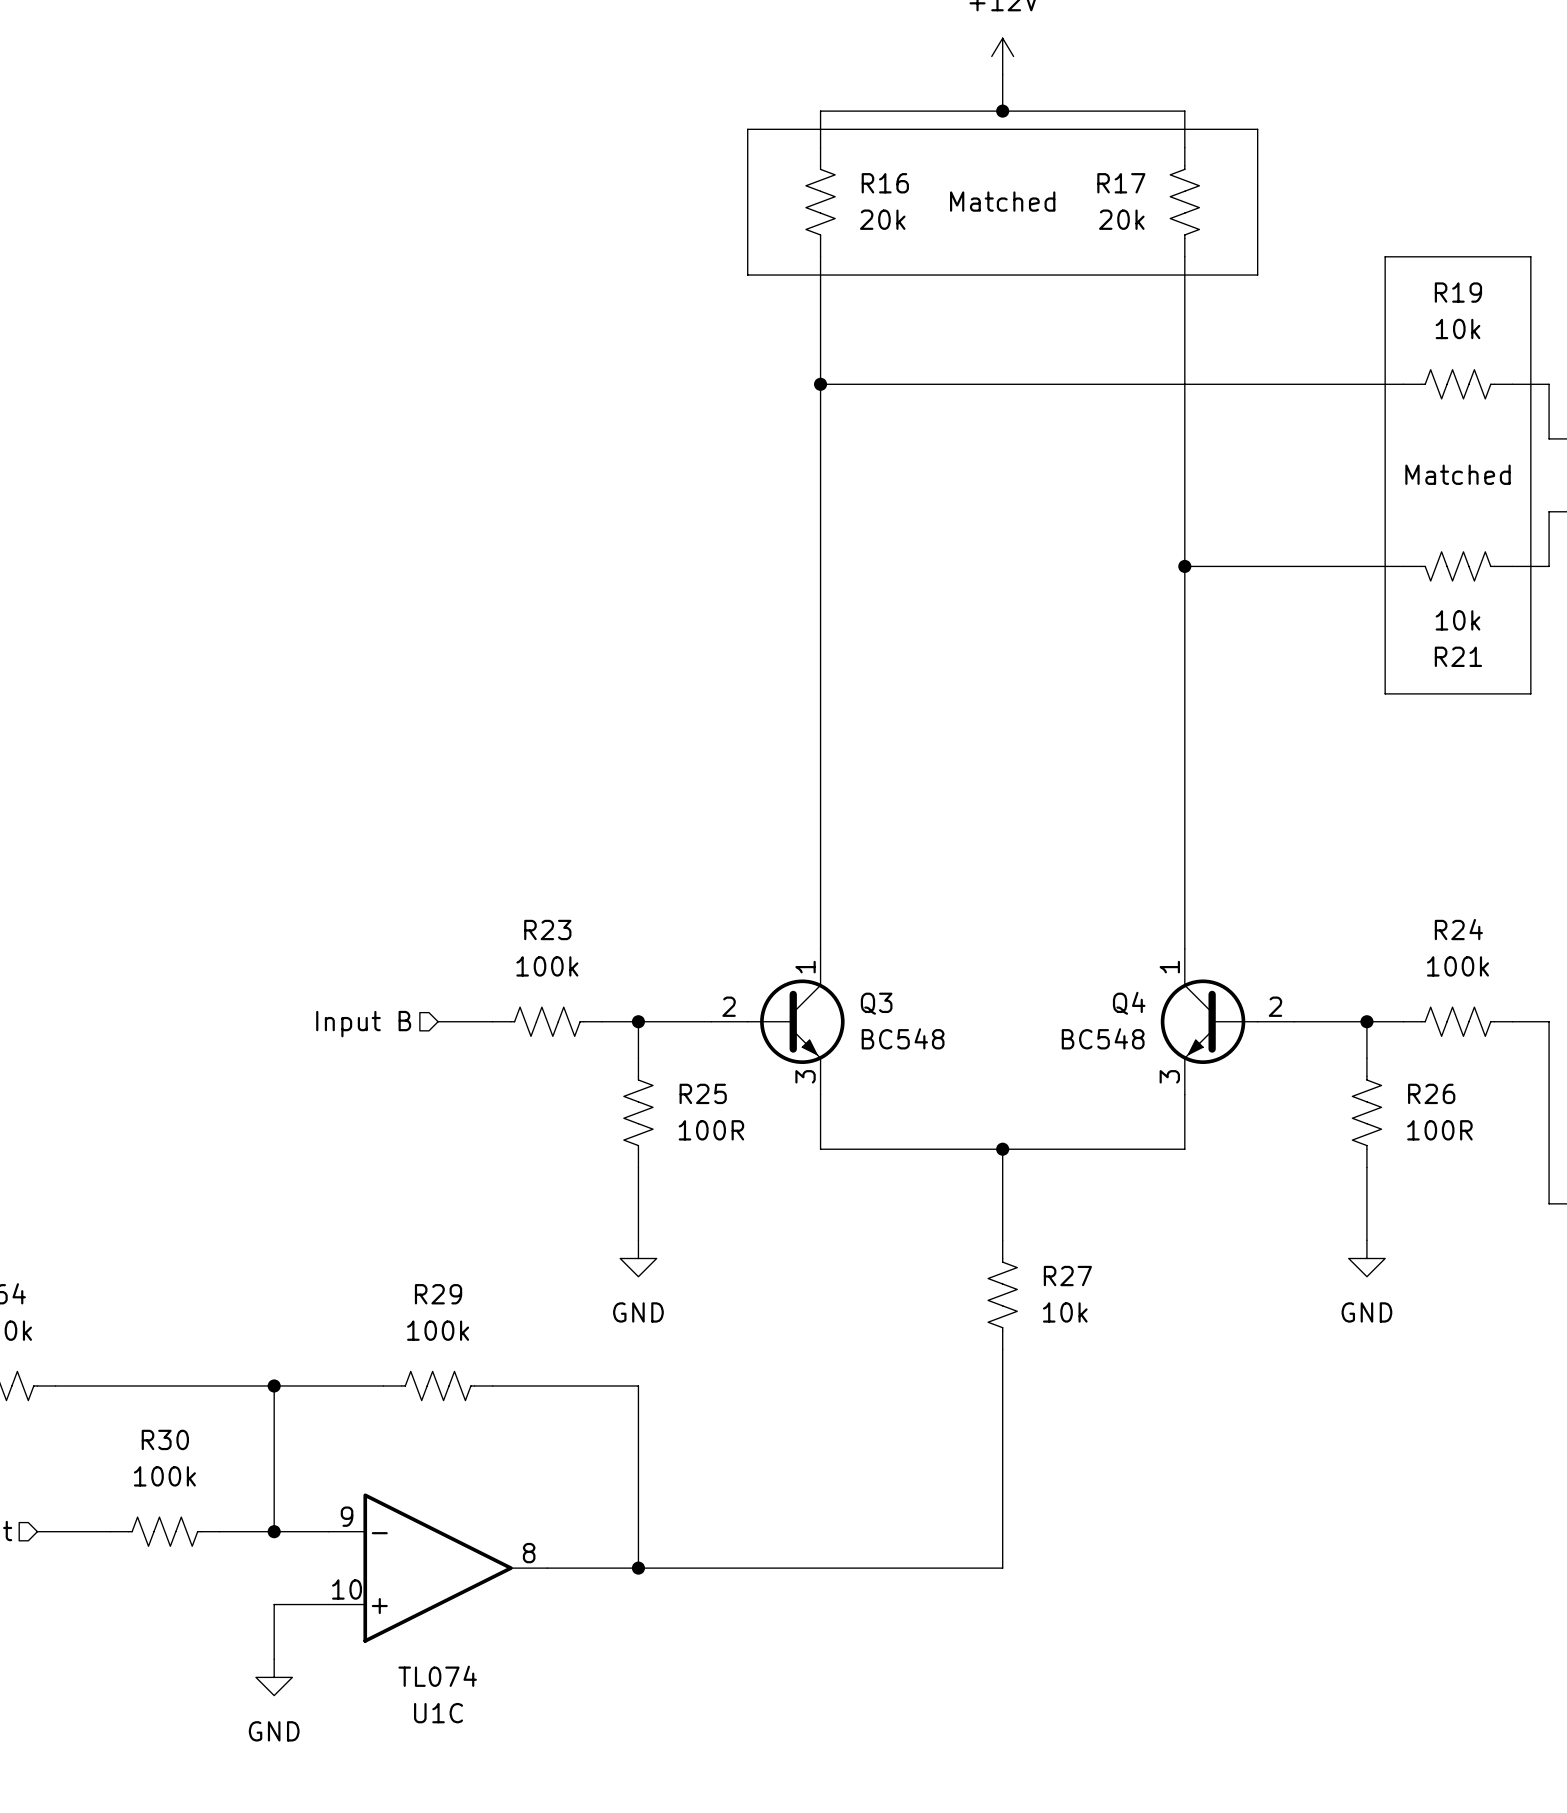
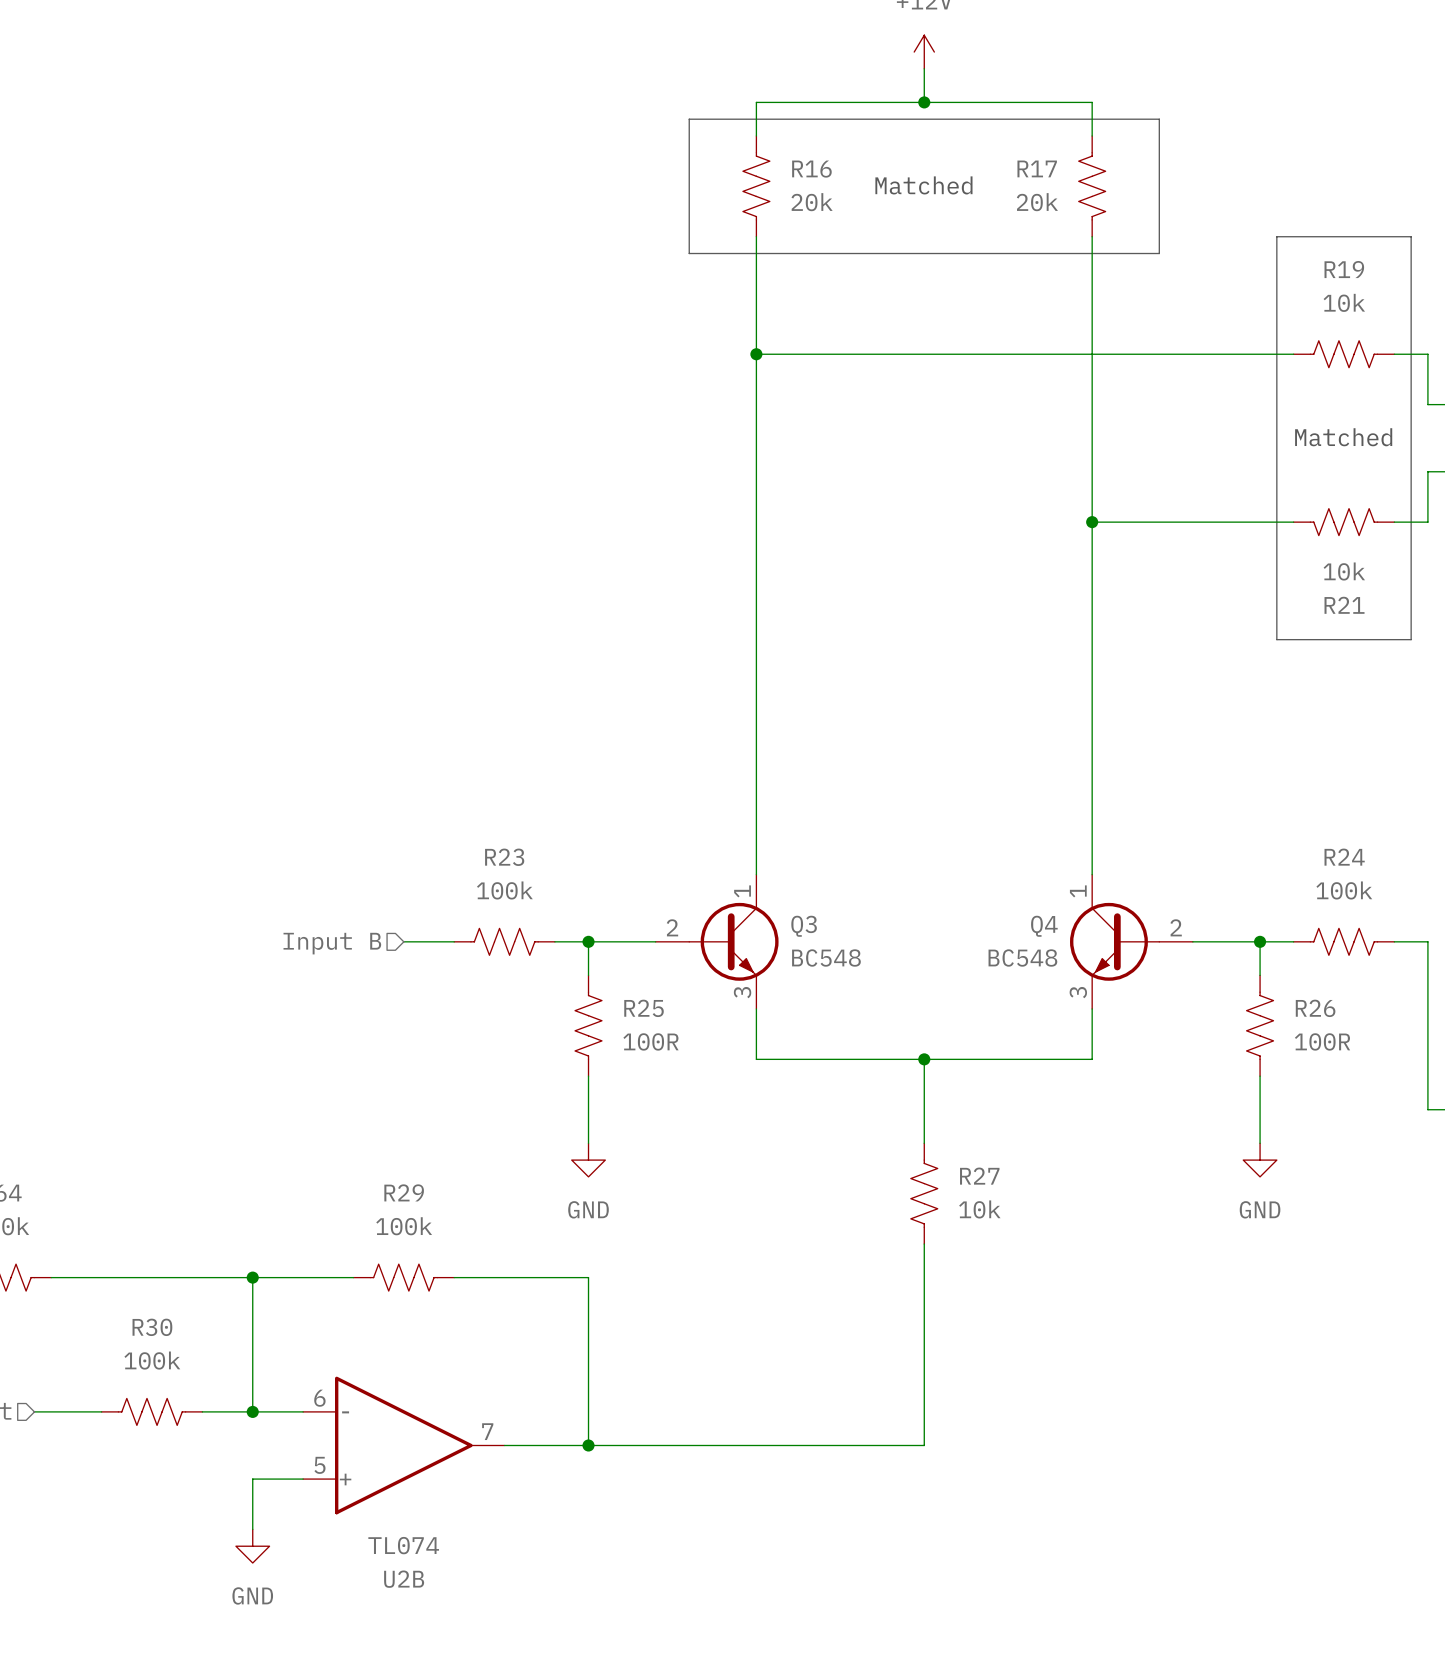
U1C pin number: 9 (347, 1516) -> 6 (319, 1398)
U1C pin number: 8 (529, 1553) -> 7 (487, 1431)
U1C pin number: 10 (347, 1589) -> 5 (319, 1465)
U1C name: U1C (438, 1713) -> U2B (404, 1579)

